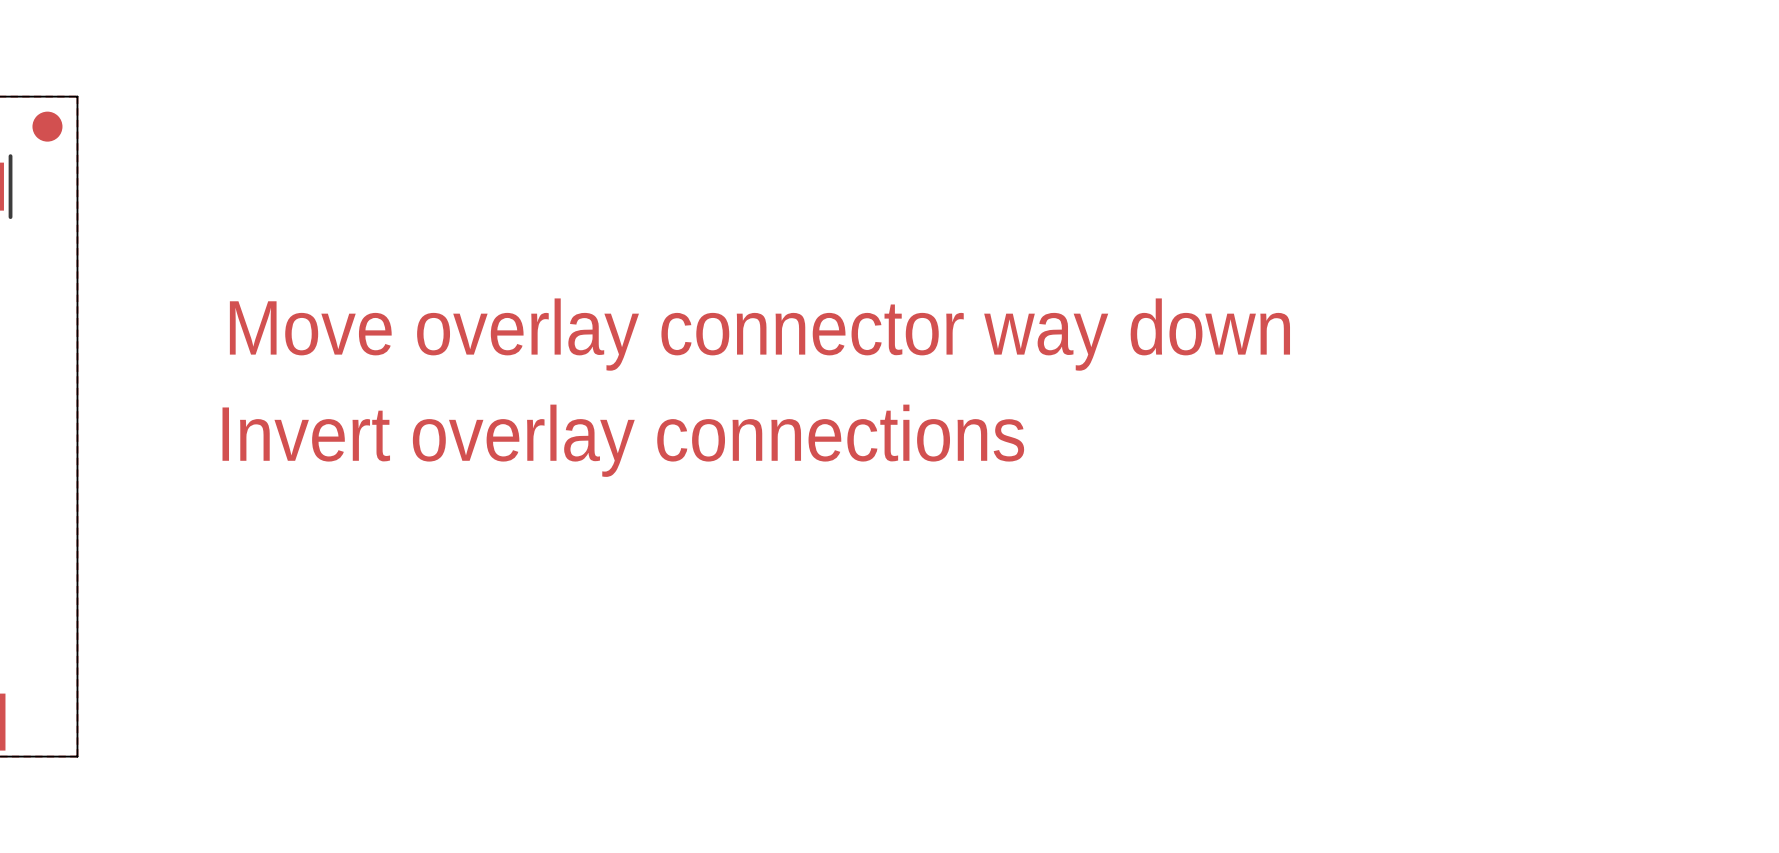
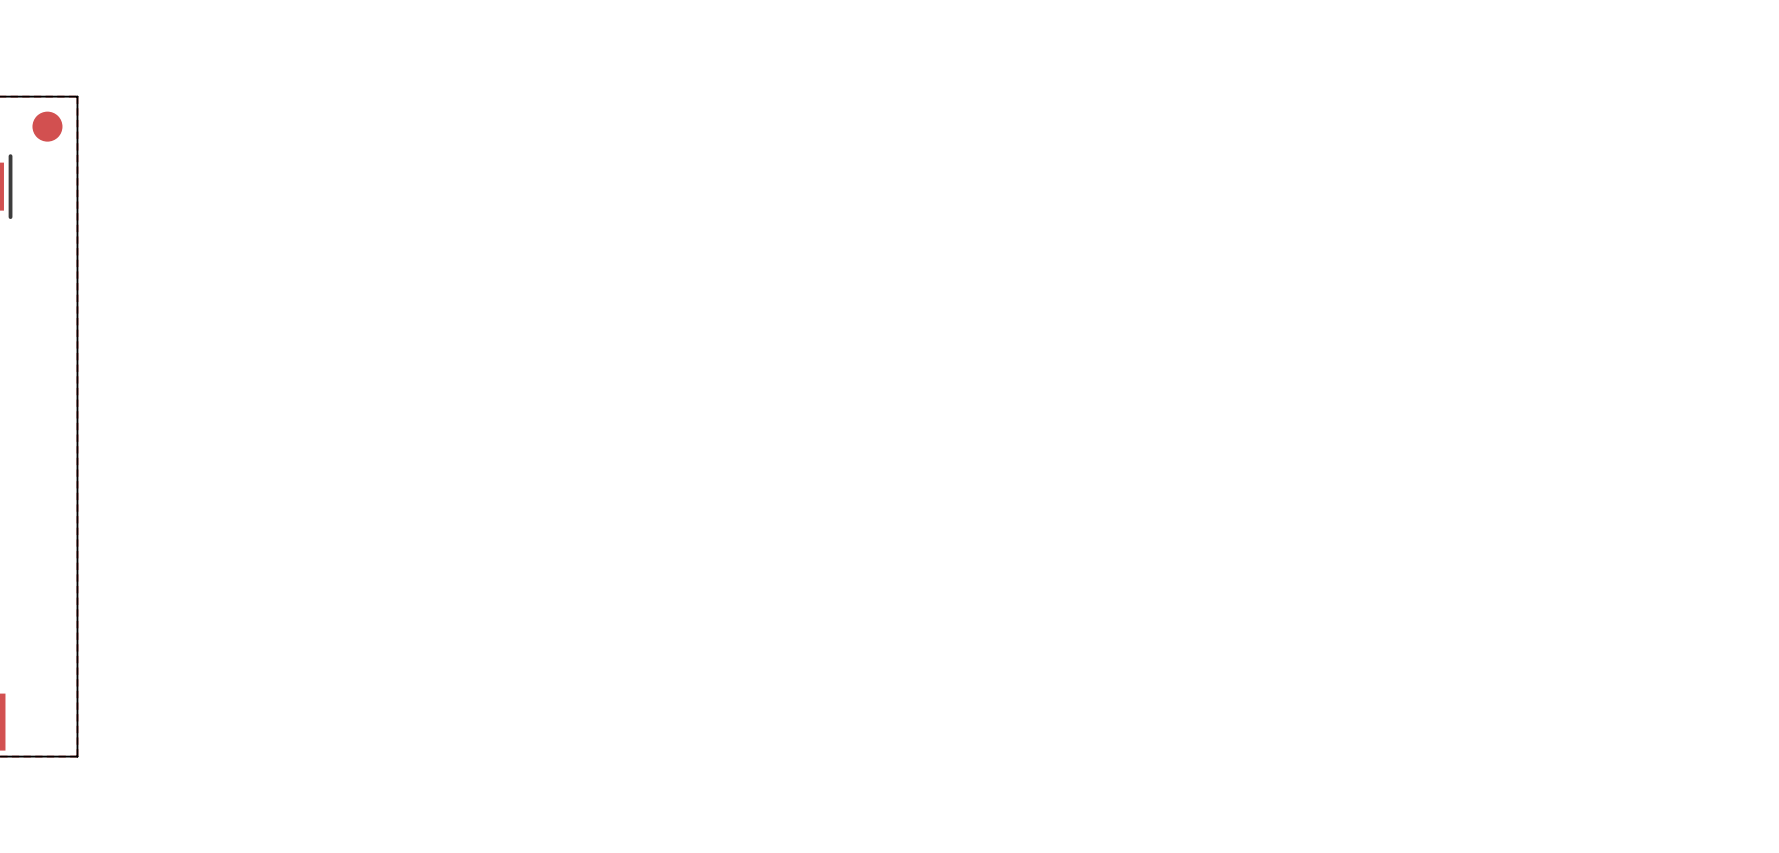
text: Move overlay connector way down (759, 334) -> none
text: Invert overlay connections (623, 440) -> none

